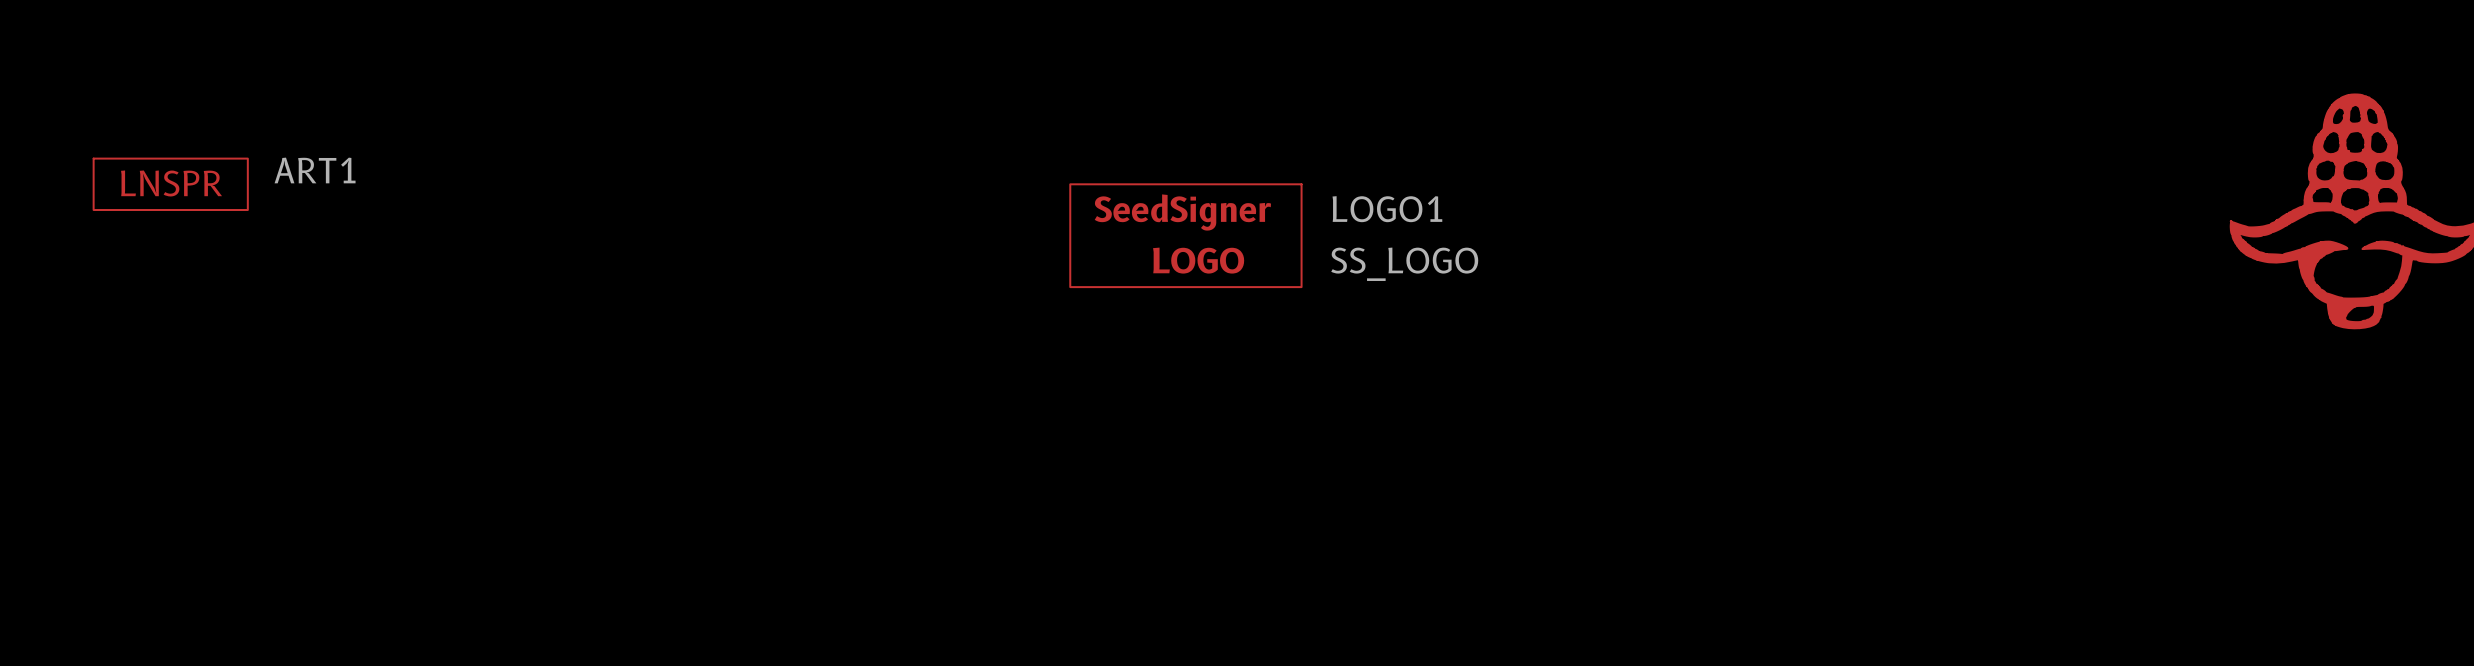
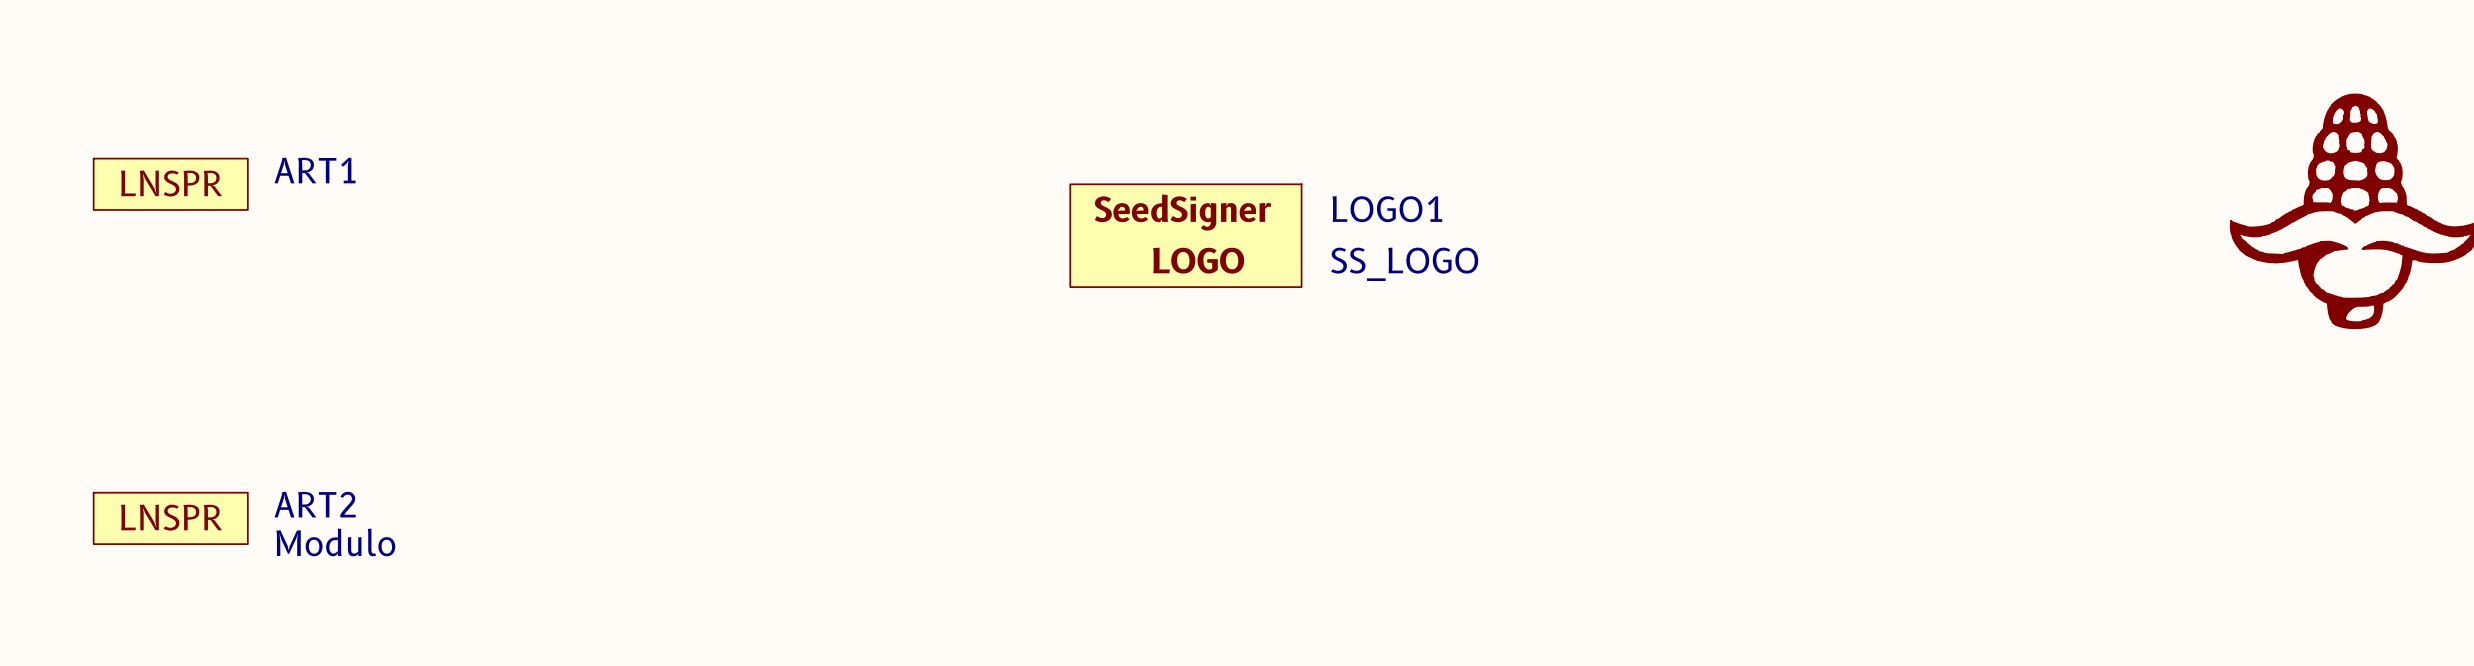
ART2: none -> Modulo (170, 518)

